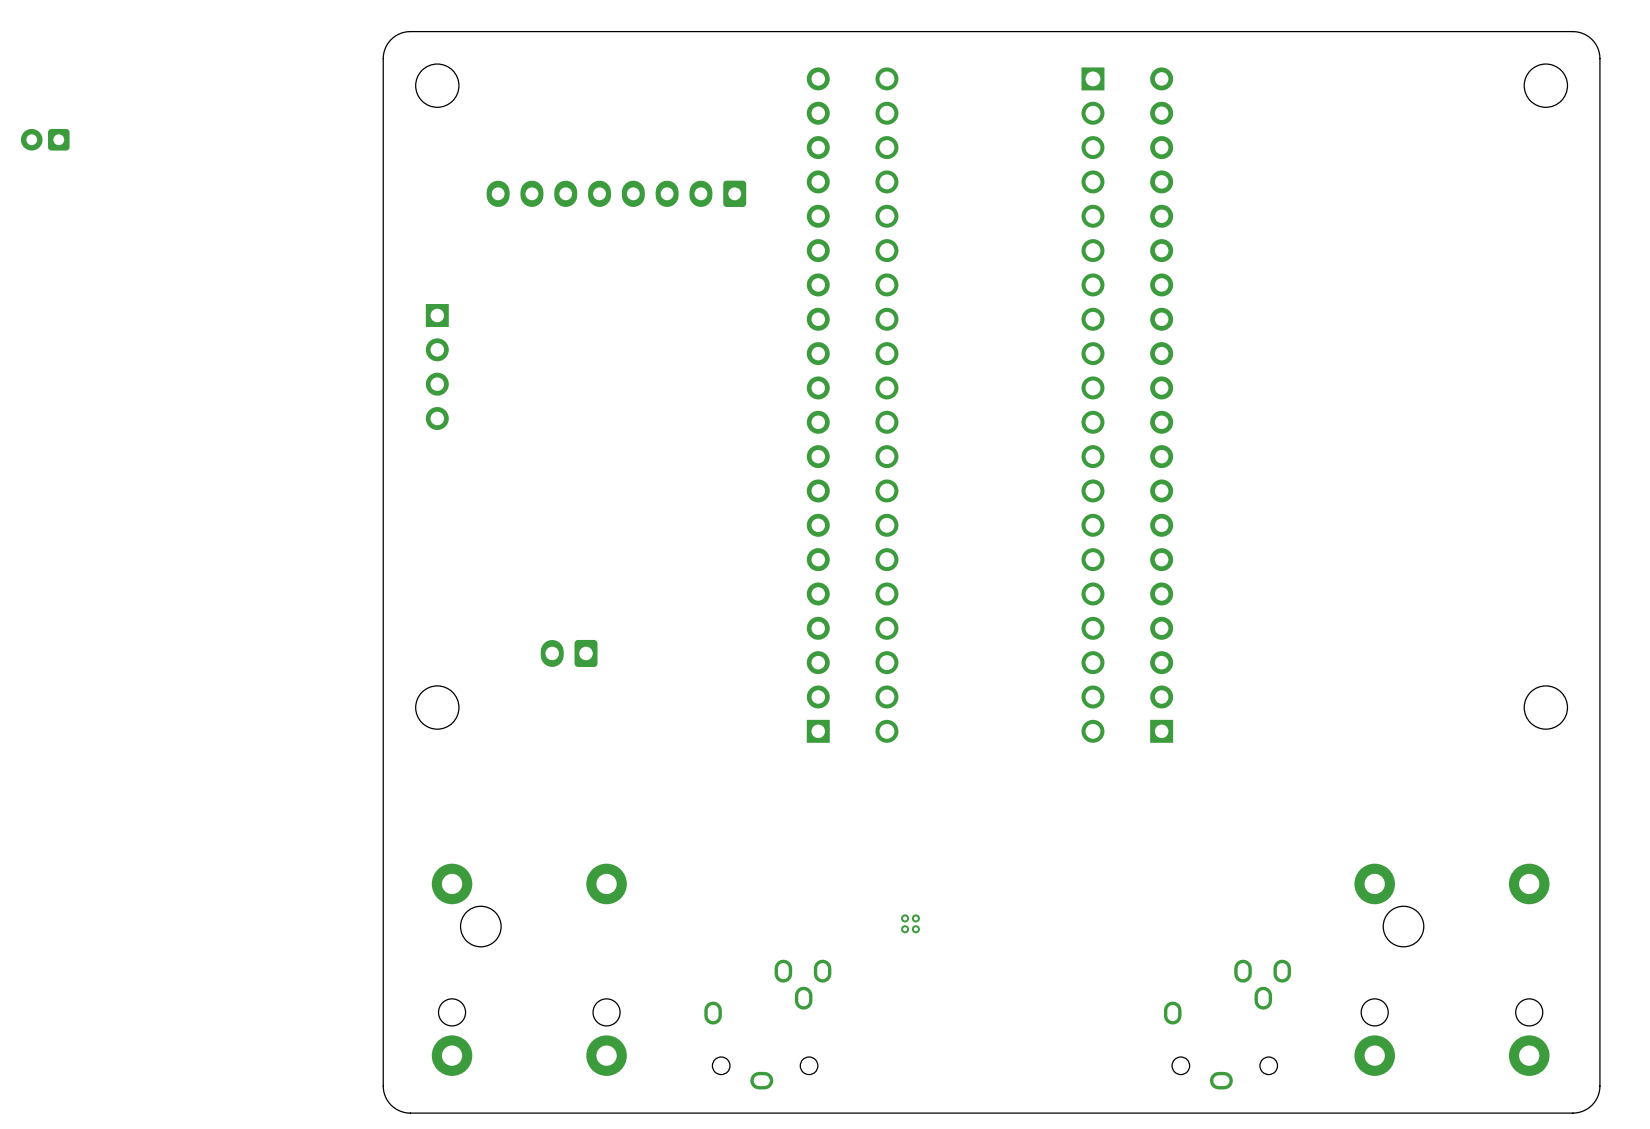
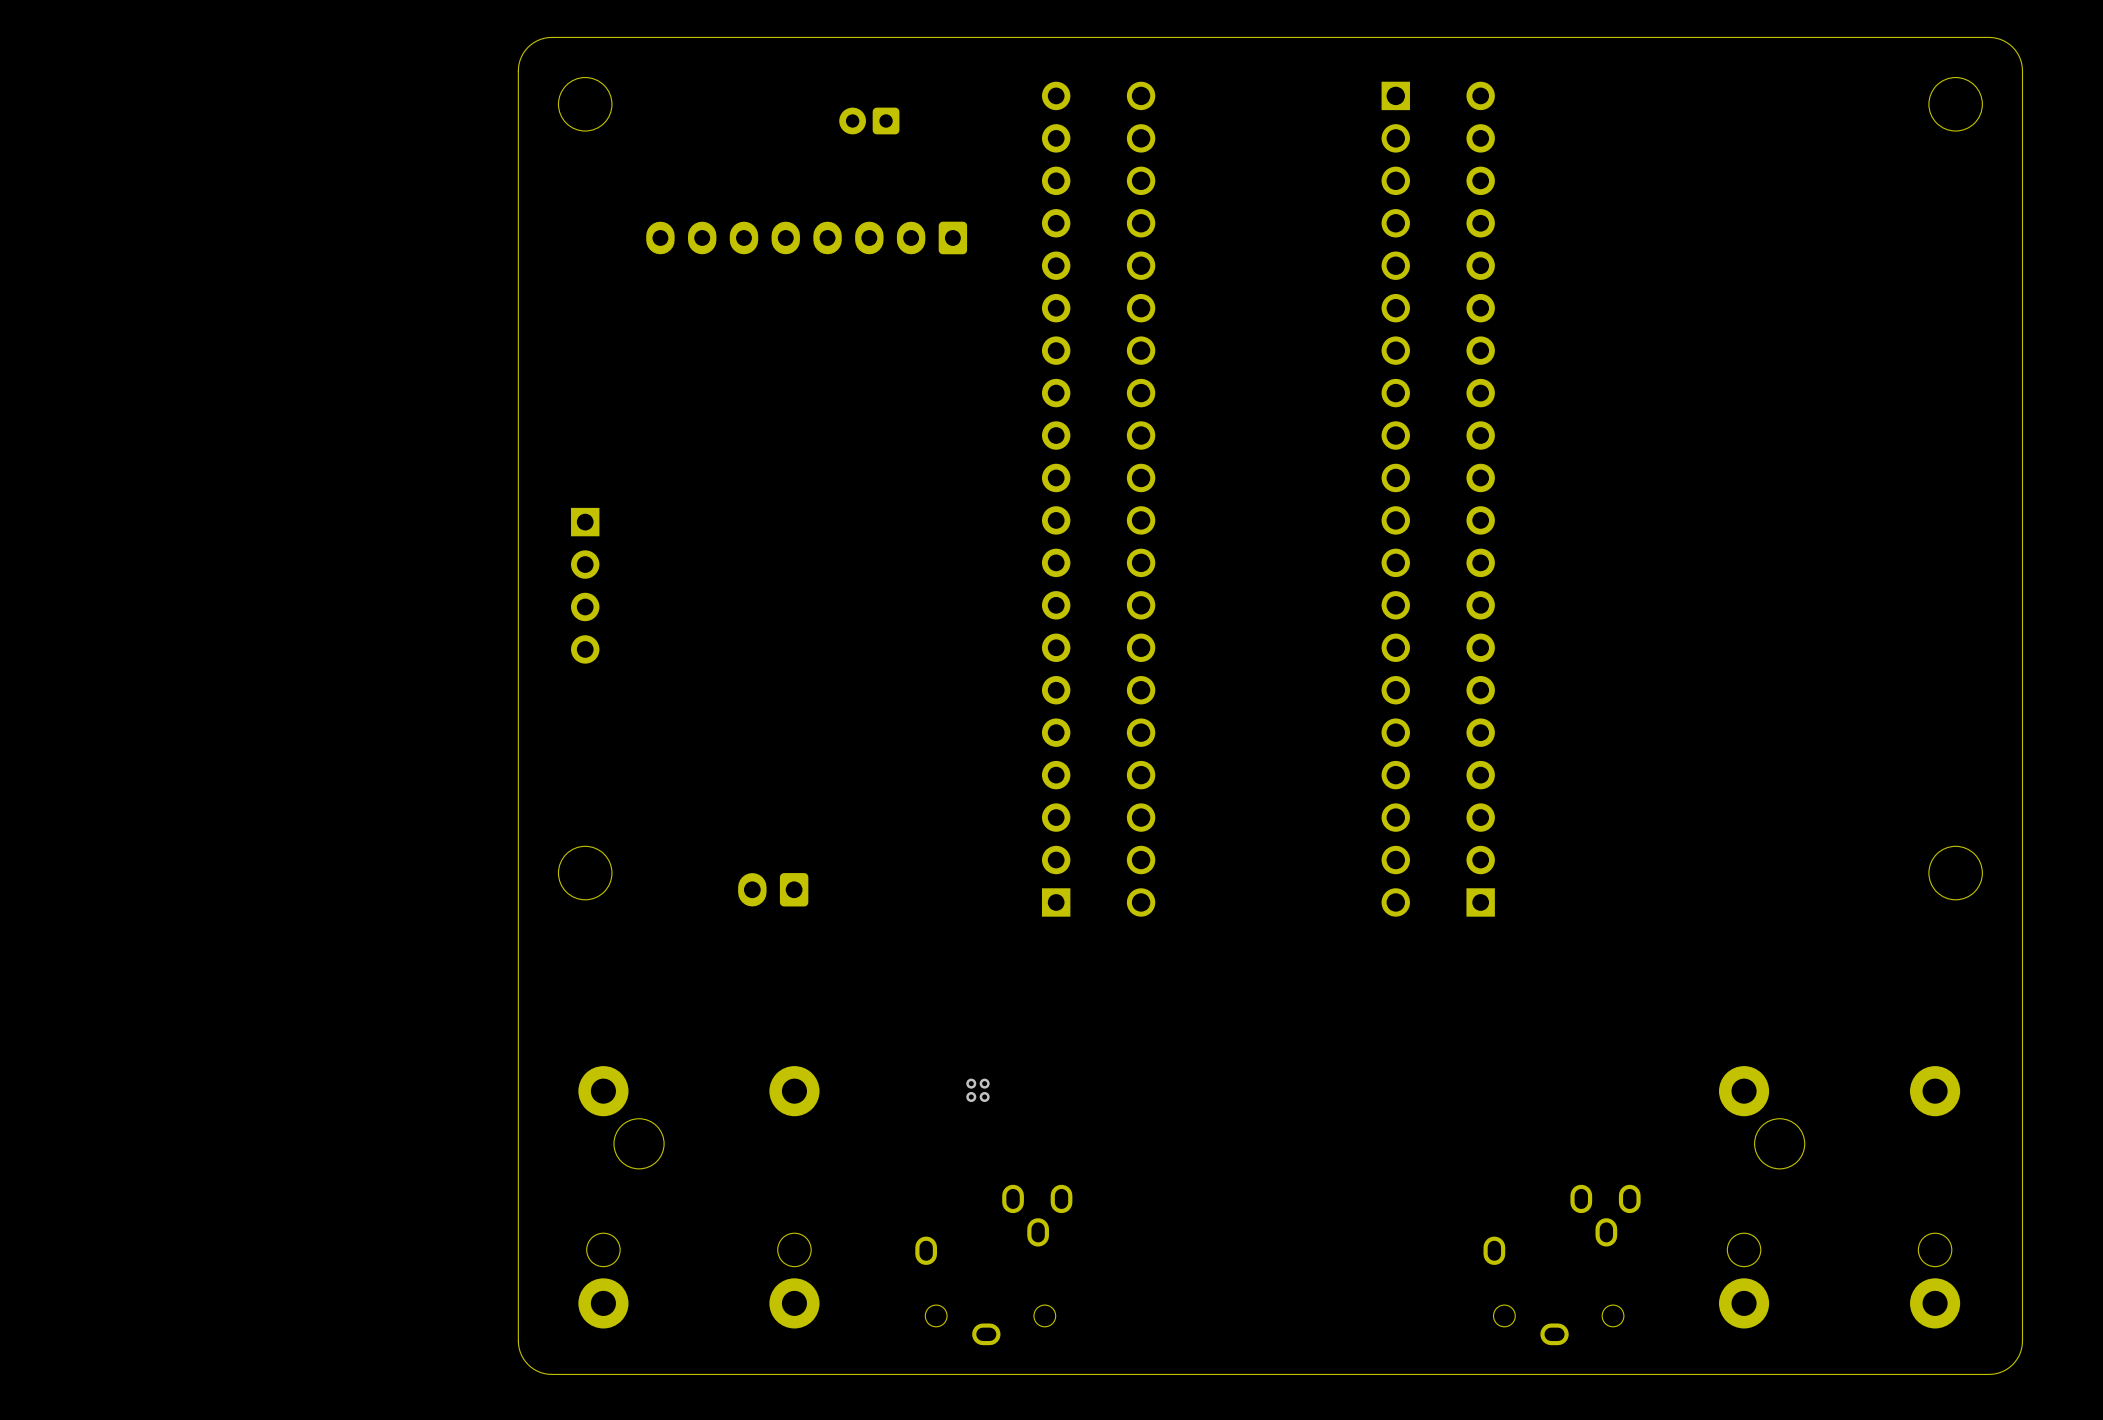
part: none -> (869, 120)
part: (45, 139) -> none
part position: (437, 367) -> (585, 585)
part position: (569, 653) -> (773, 889)
via: none -> (971, 1083)
via: none -> (984, 1083)
via: none -> (971, 1097)
via: none -> (984, 1097)
via: (905, 918) -> none
via: (915, 918) -> none
via: (905, 929) -> none
via: (915, 929) -> none

